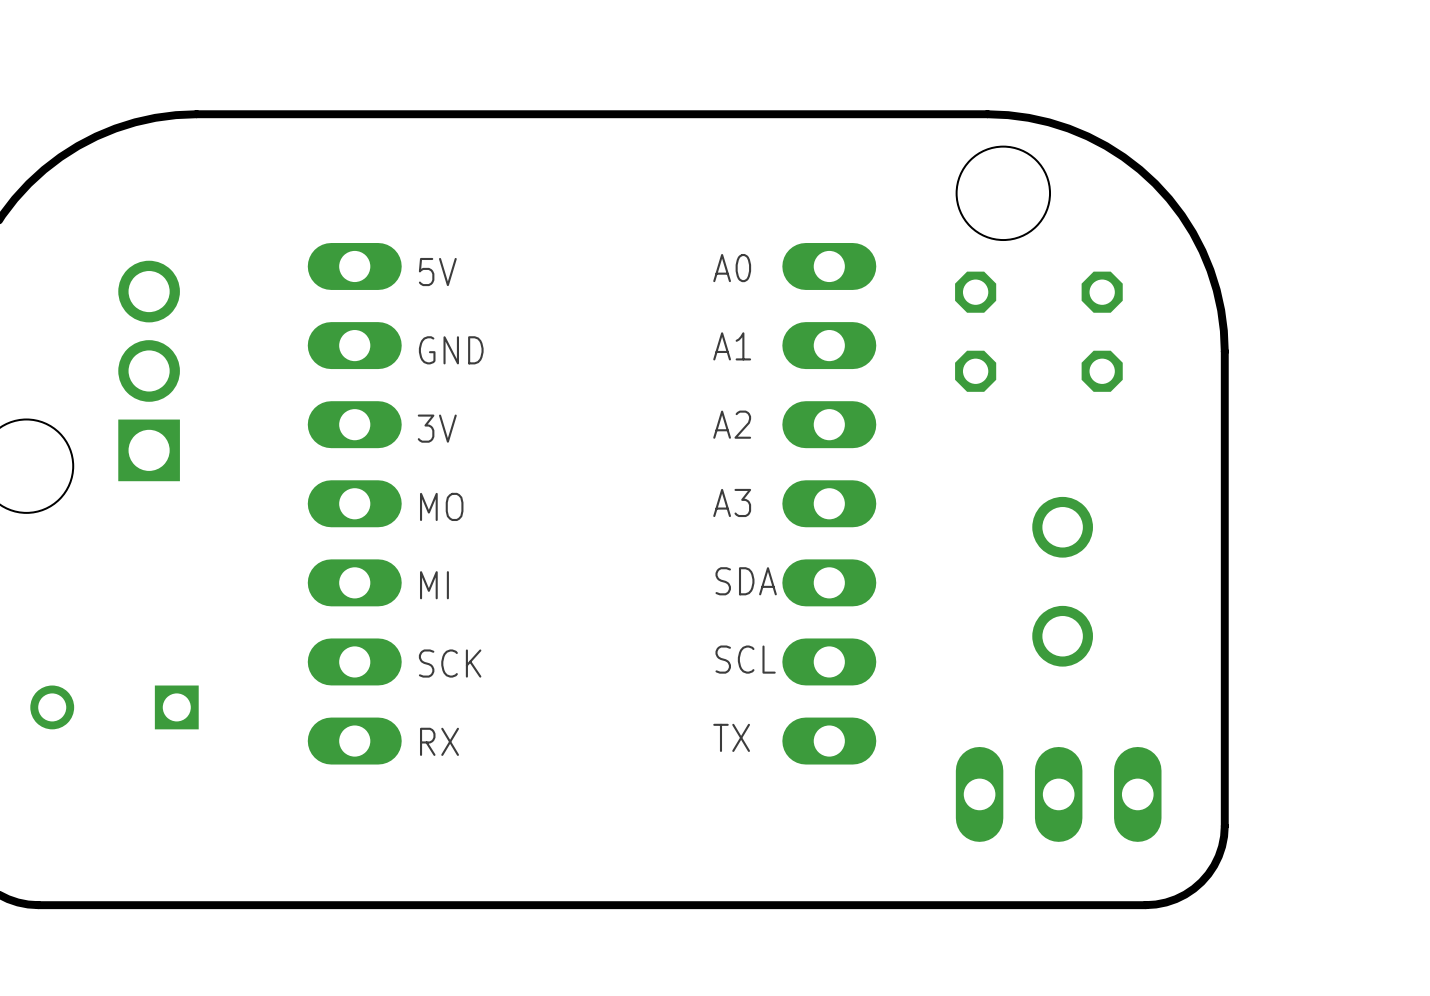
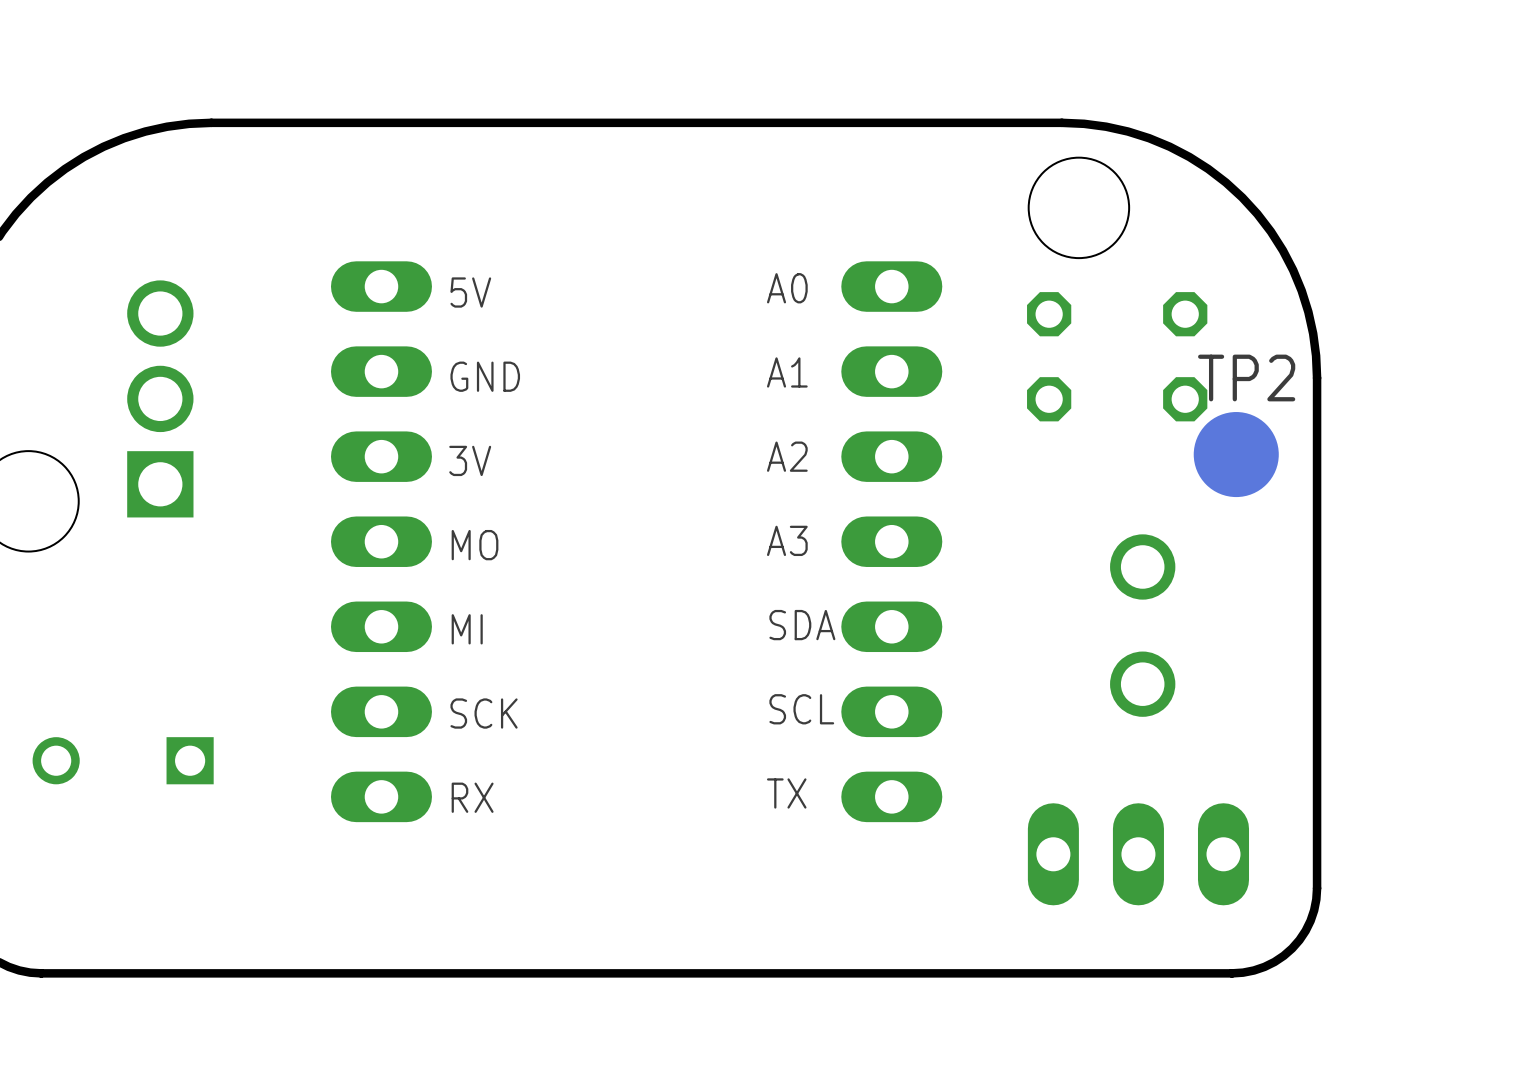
TP2: none -> (1236, 454)

